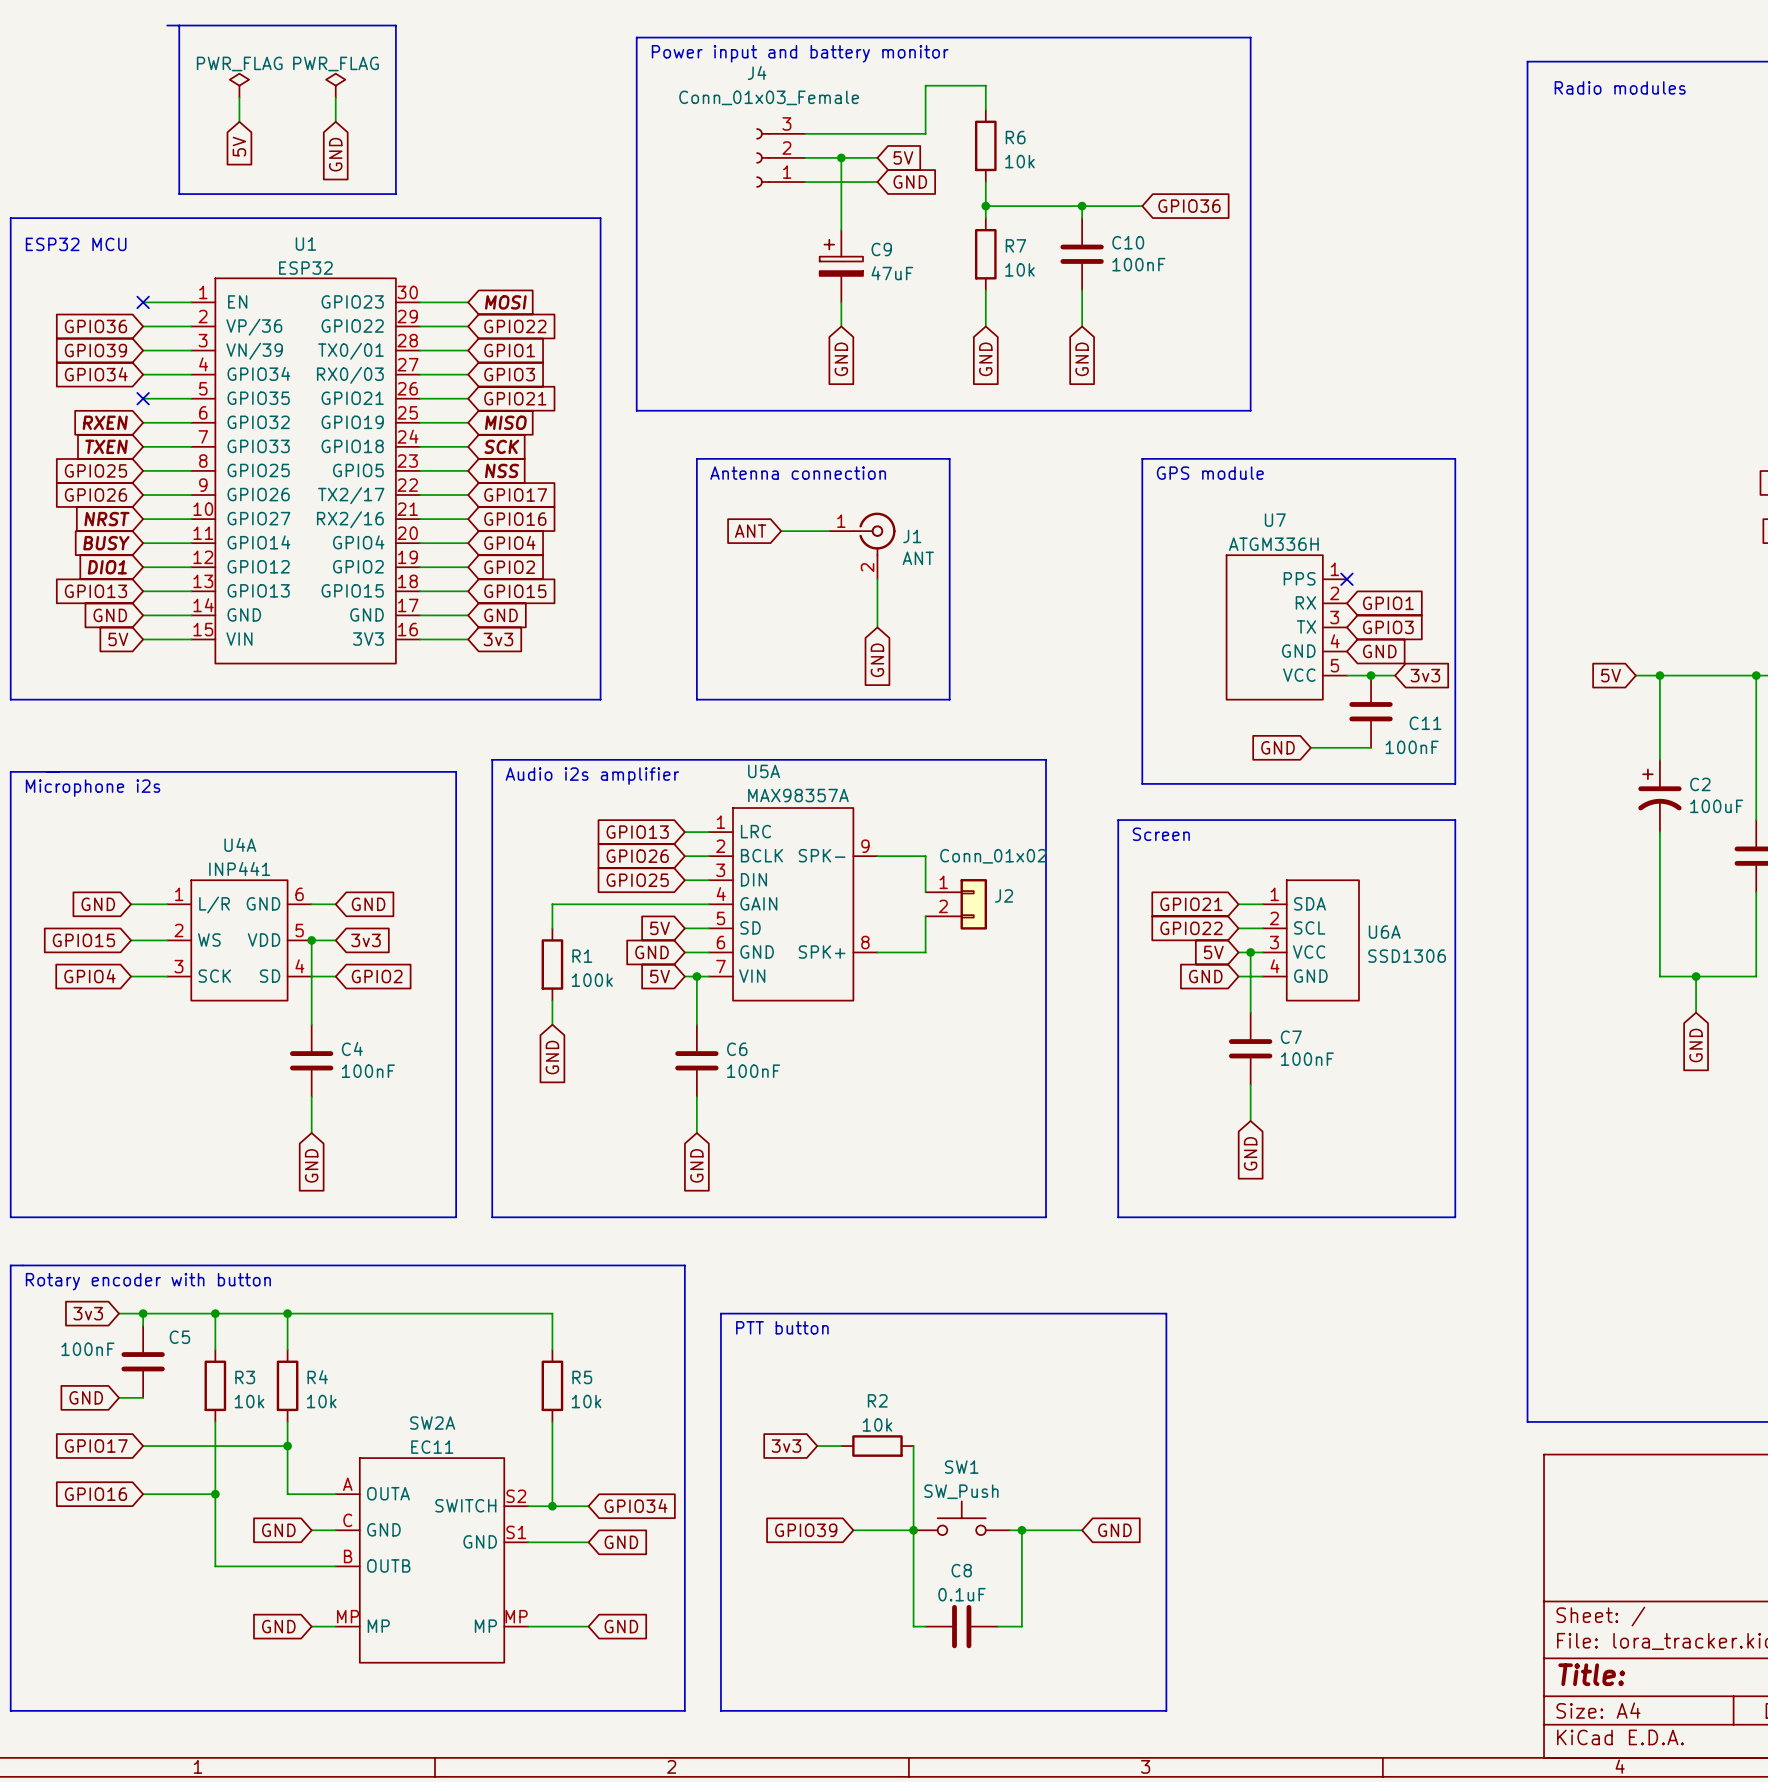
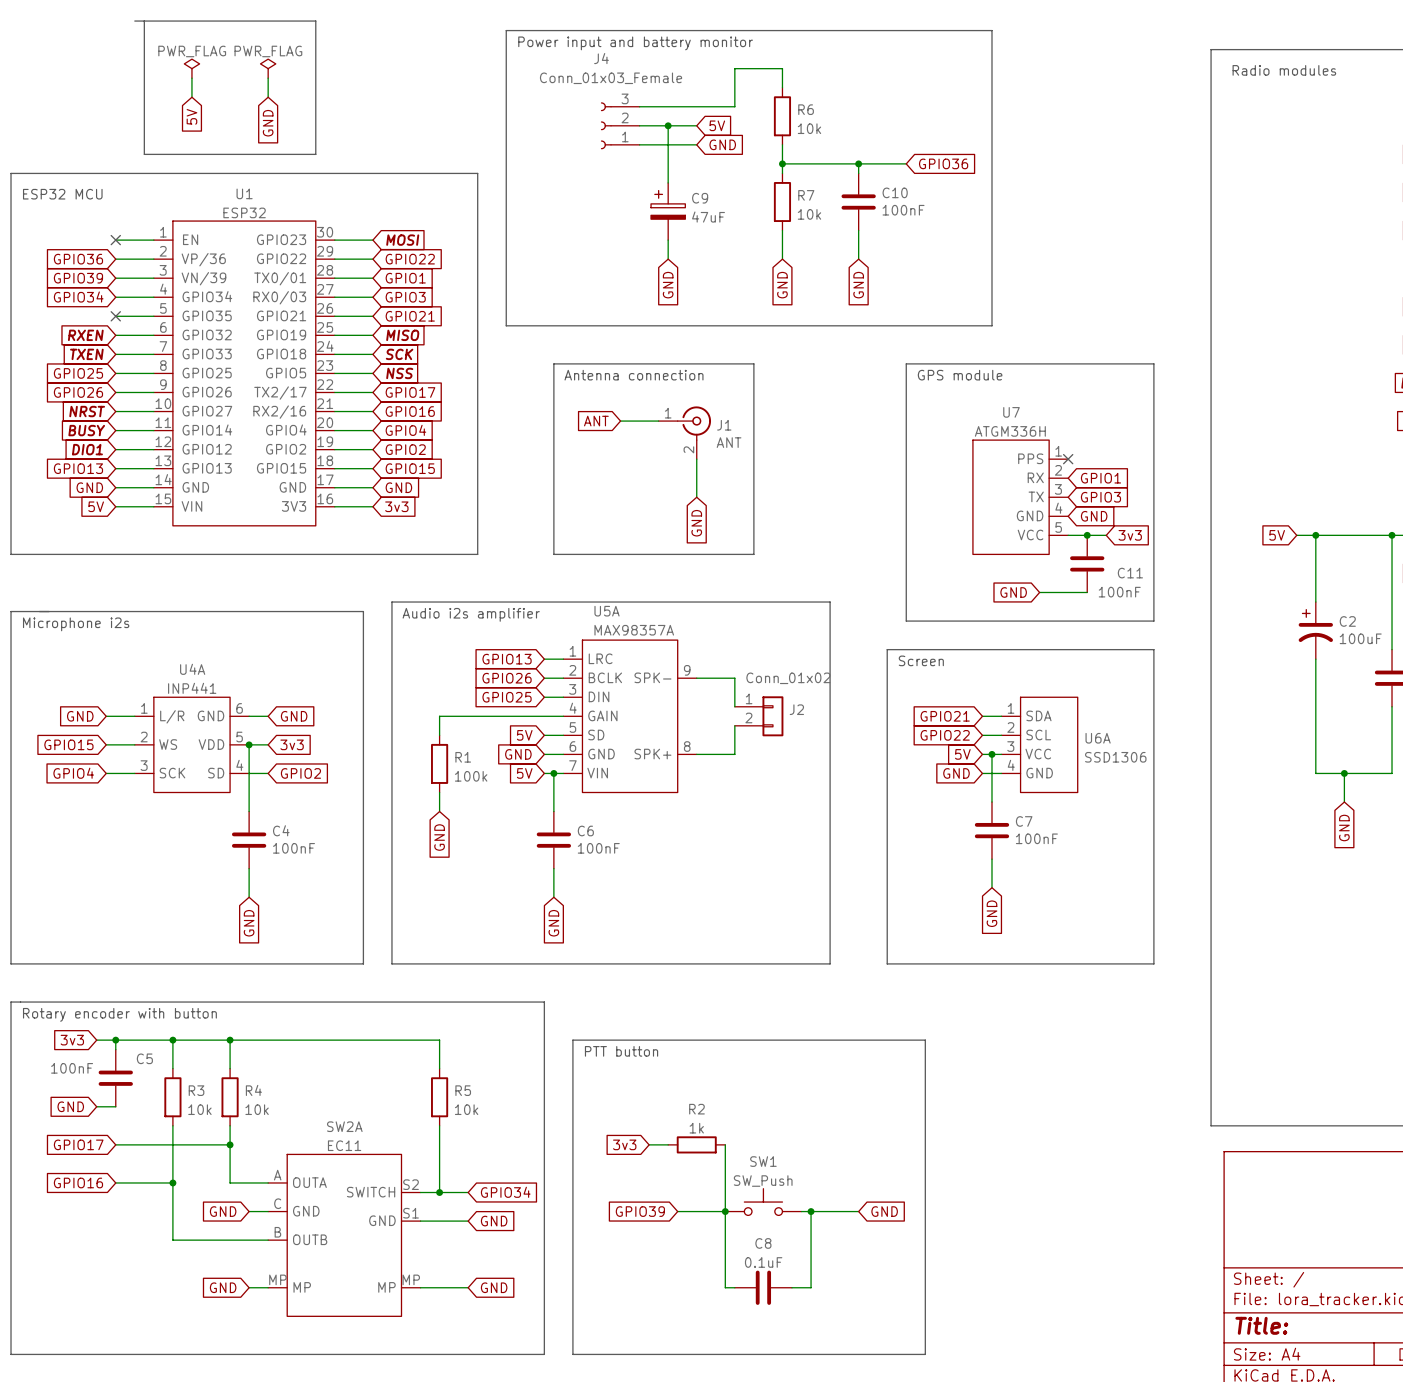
R2 value: 10k (877, 1424) -> 1k (696, 1128)

